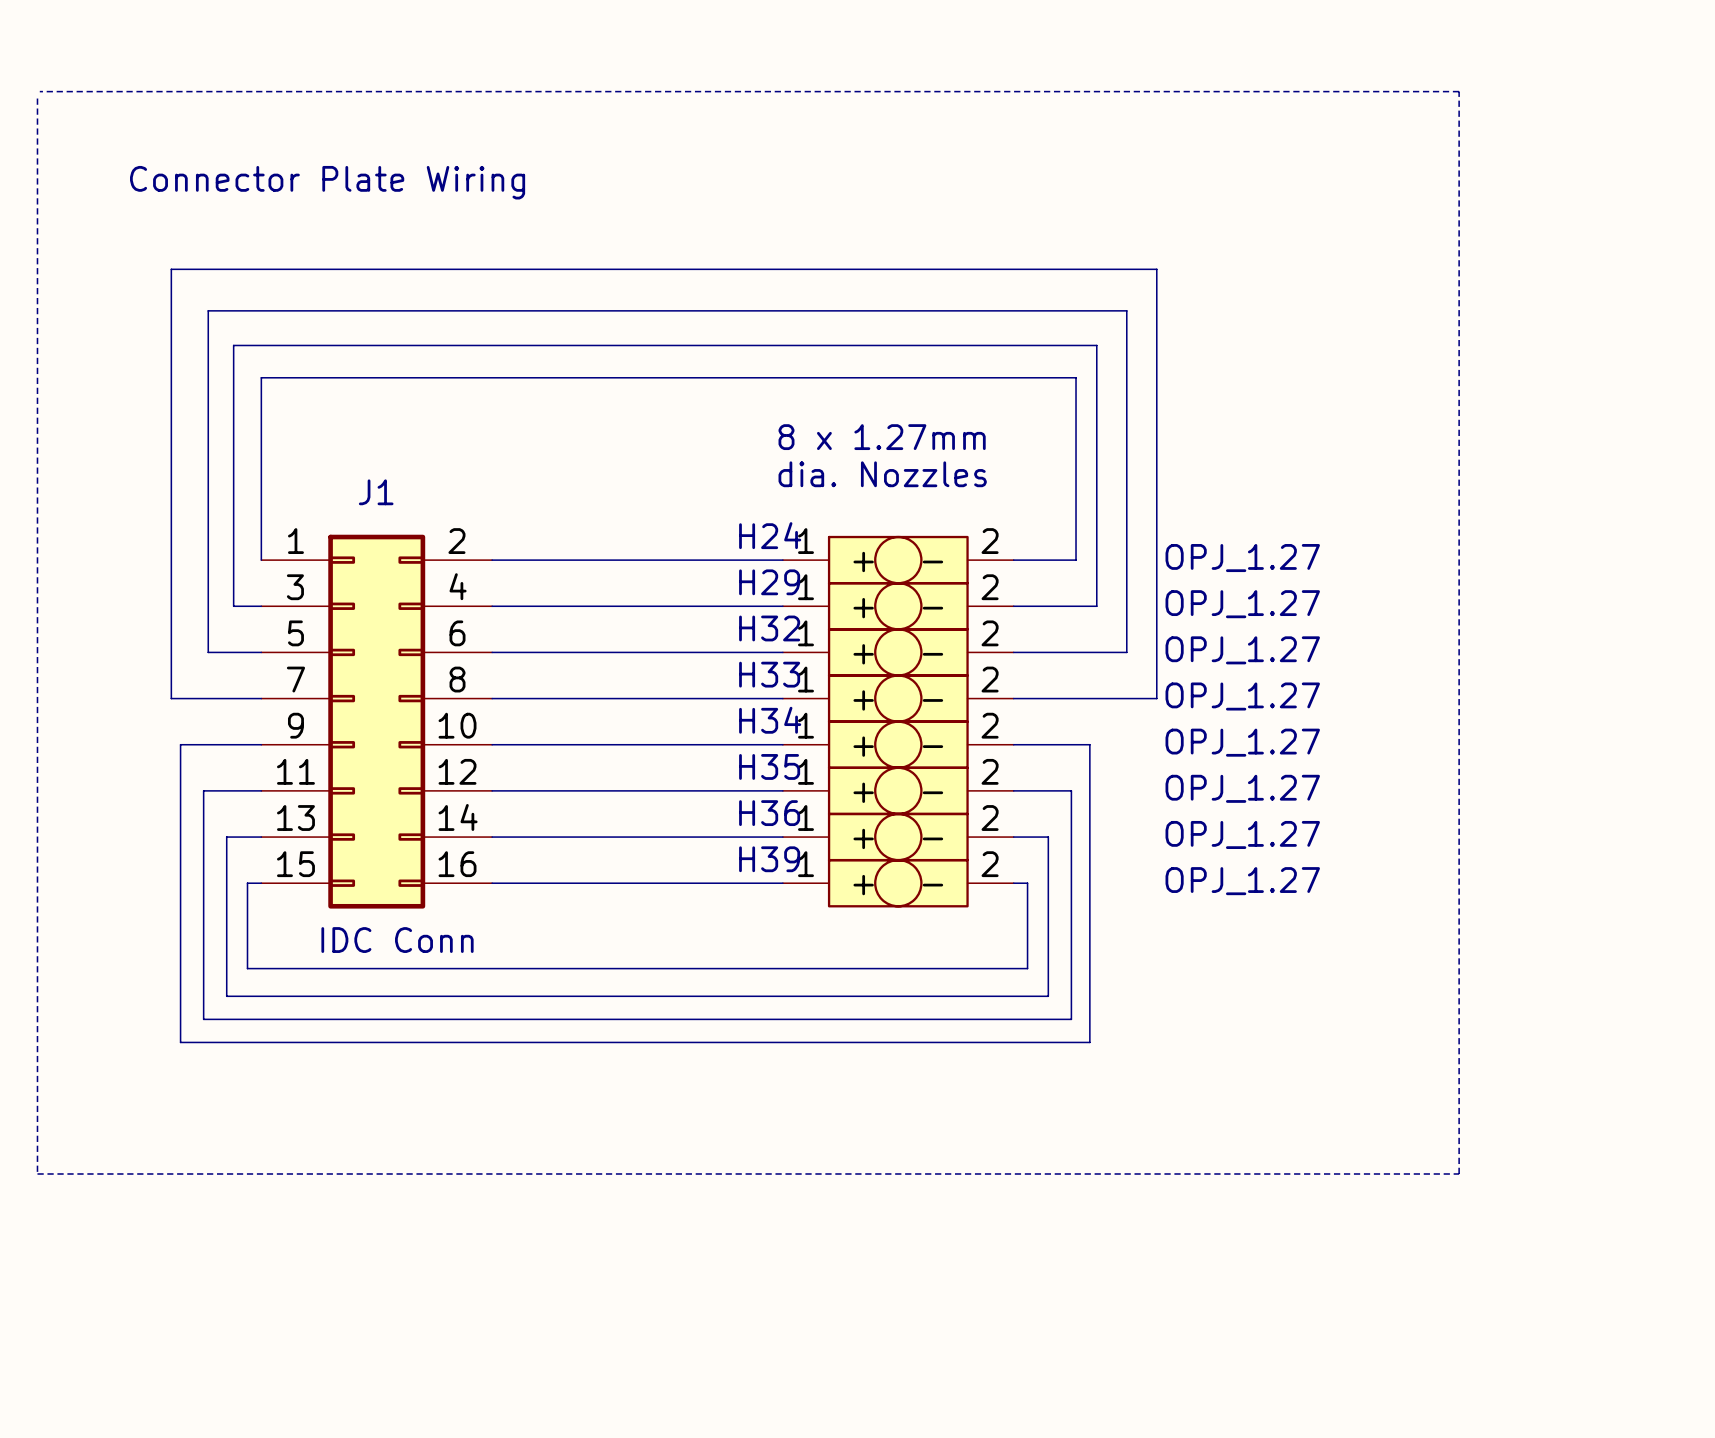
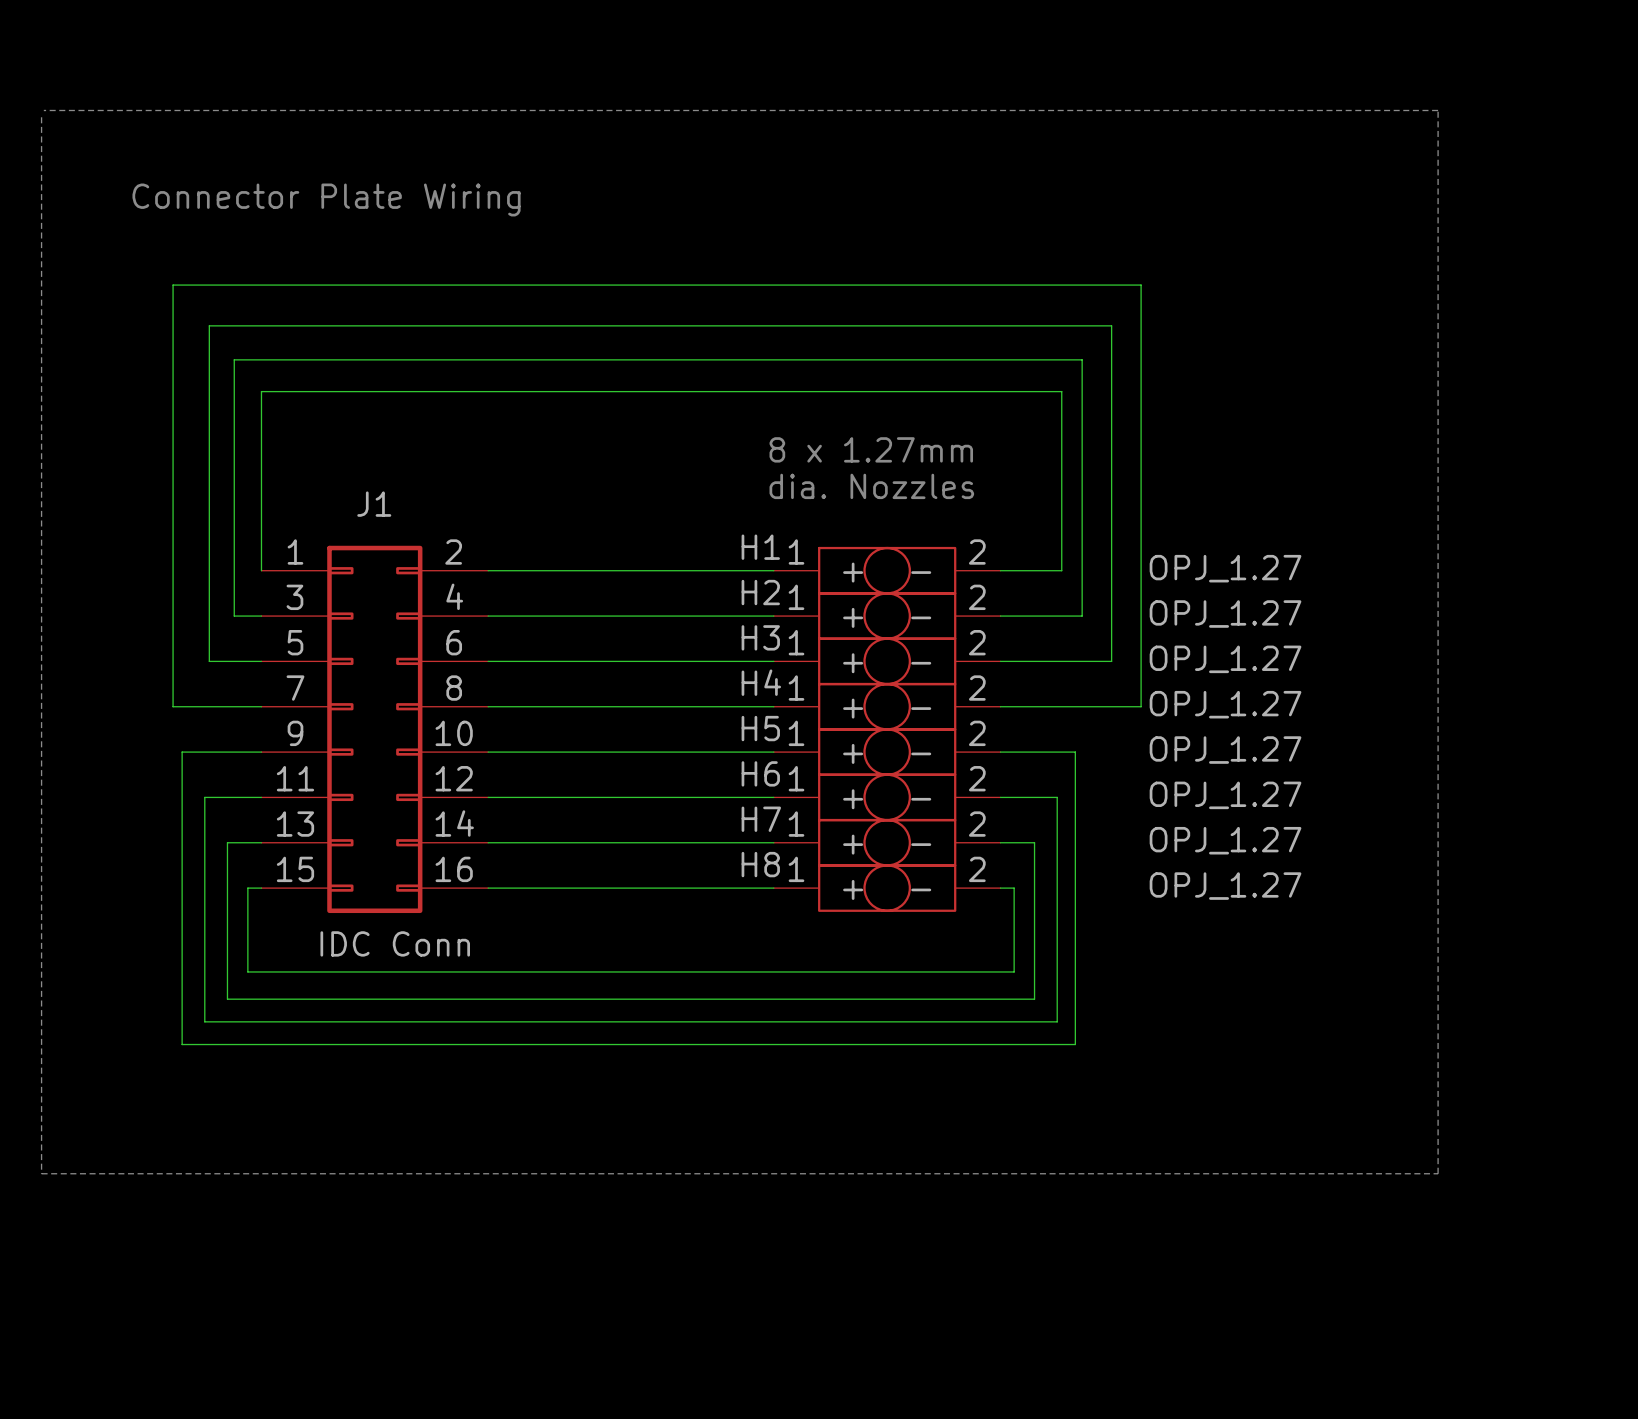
H24 name: H24 (770, 535) -> H1 (760, 547)
H29 name: H29 (769, 582) -> H2 (760, 592)
H32 name: H32 (769, 628) -> H3 (760, 637)
H33 name: H33 (769, 674) -> H4 (761, 682)
H34 name: H34 (770, 720) -> H5 (760, 728)
H35 name: H35 (769, 766) -> H6 (760, 773)
H36 name: H36 (769, 813) -> H7 (761, 819)
H39 name: H39 (769, 859) -> H8 (760, 864)

